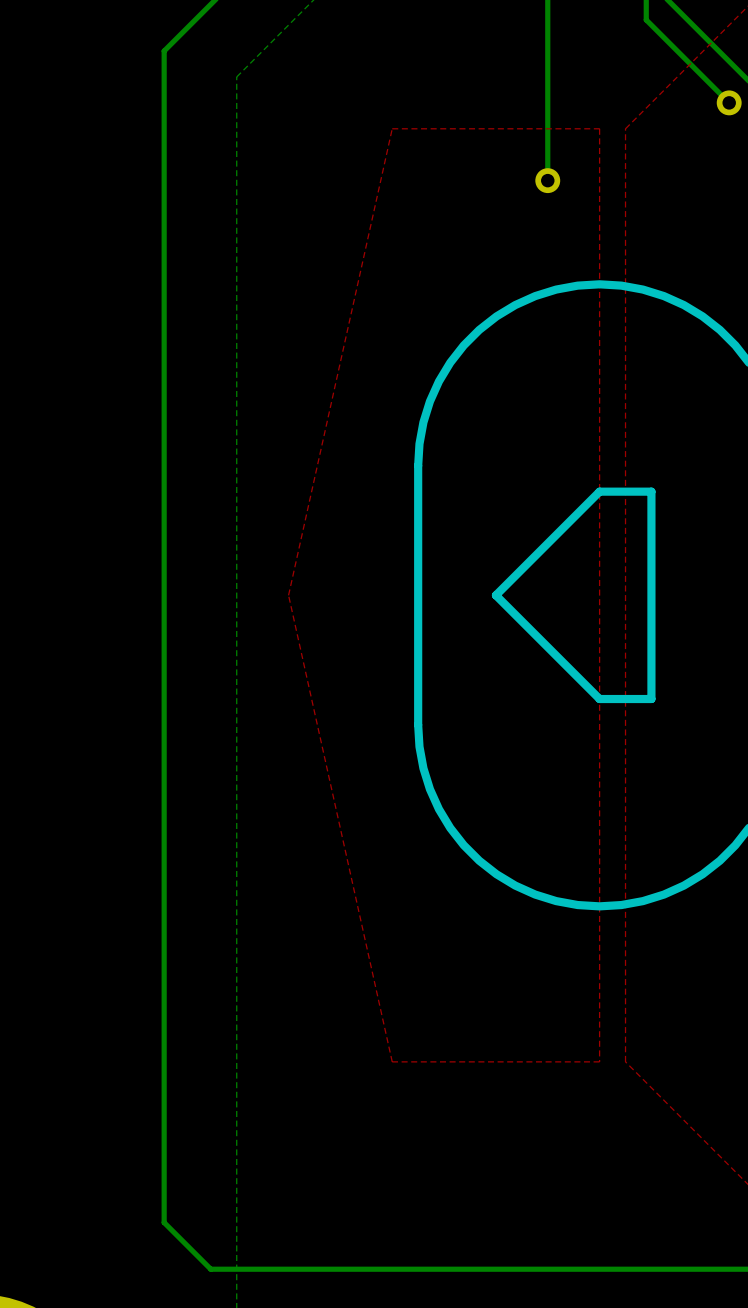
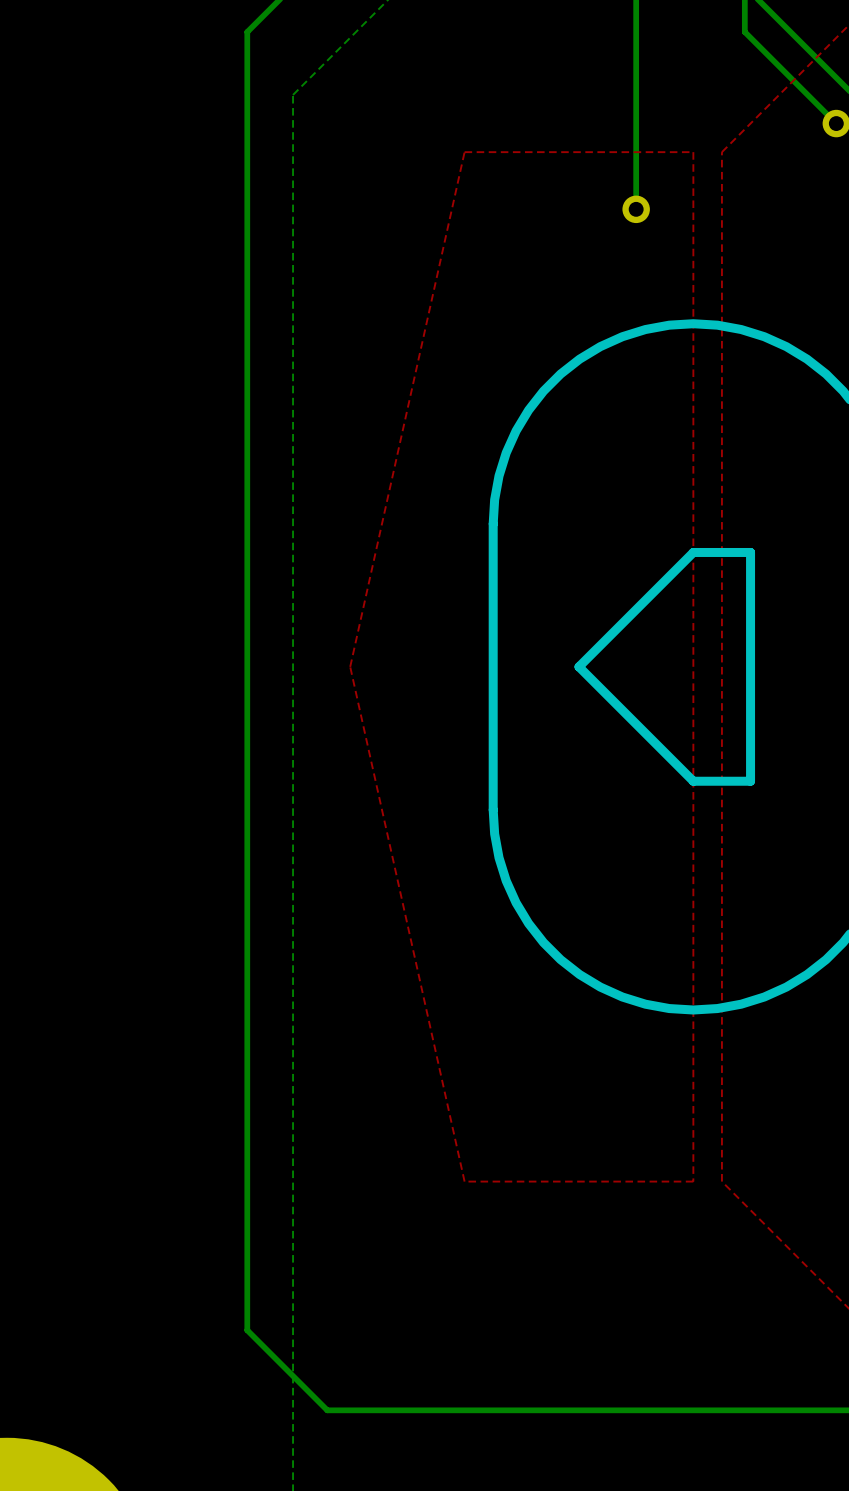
bottom track: (195, 19) (164, 51) (164, 1222) (210, 1269) (267, 1269) -> (247, 32) (247, 1330) (327, 1410)

